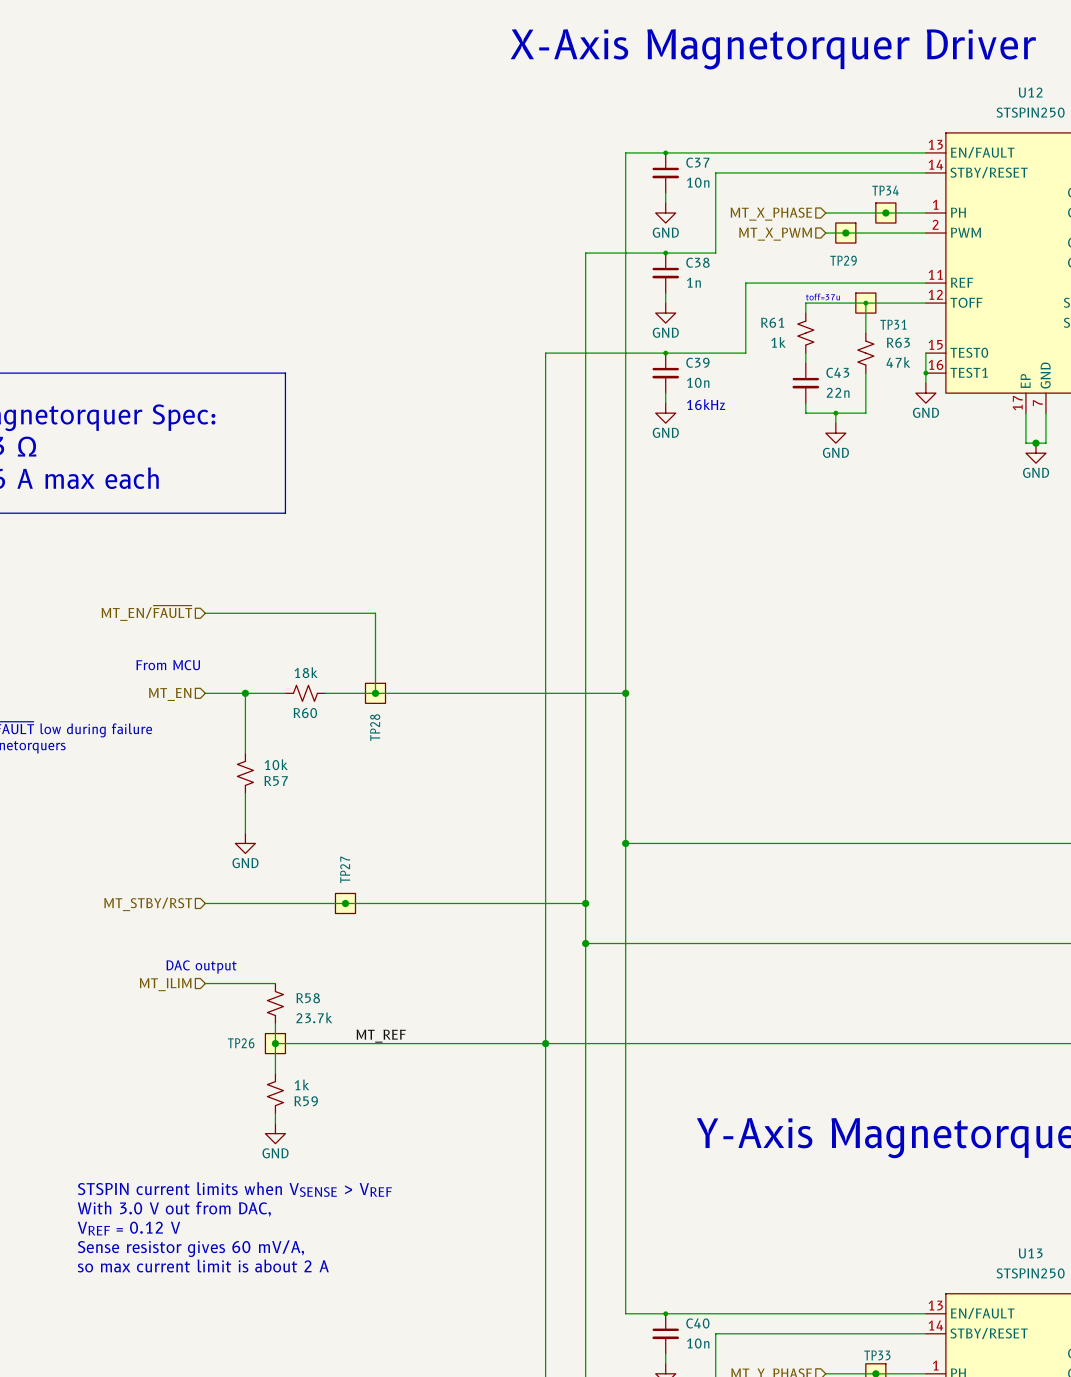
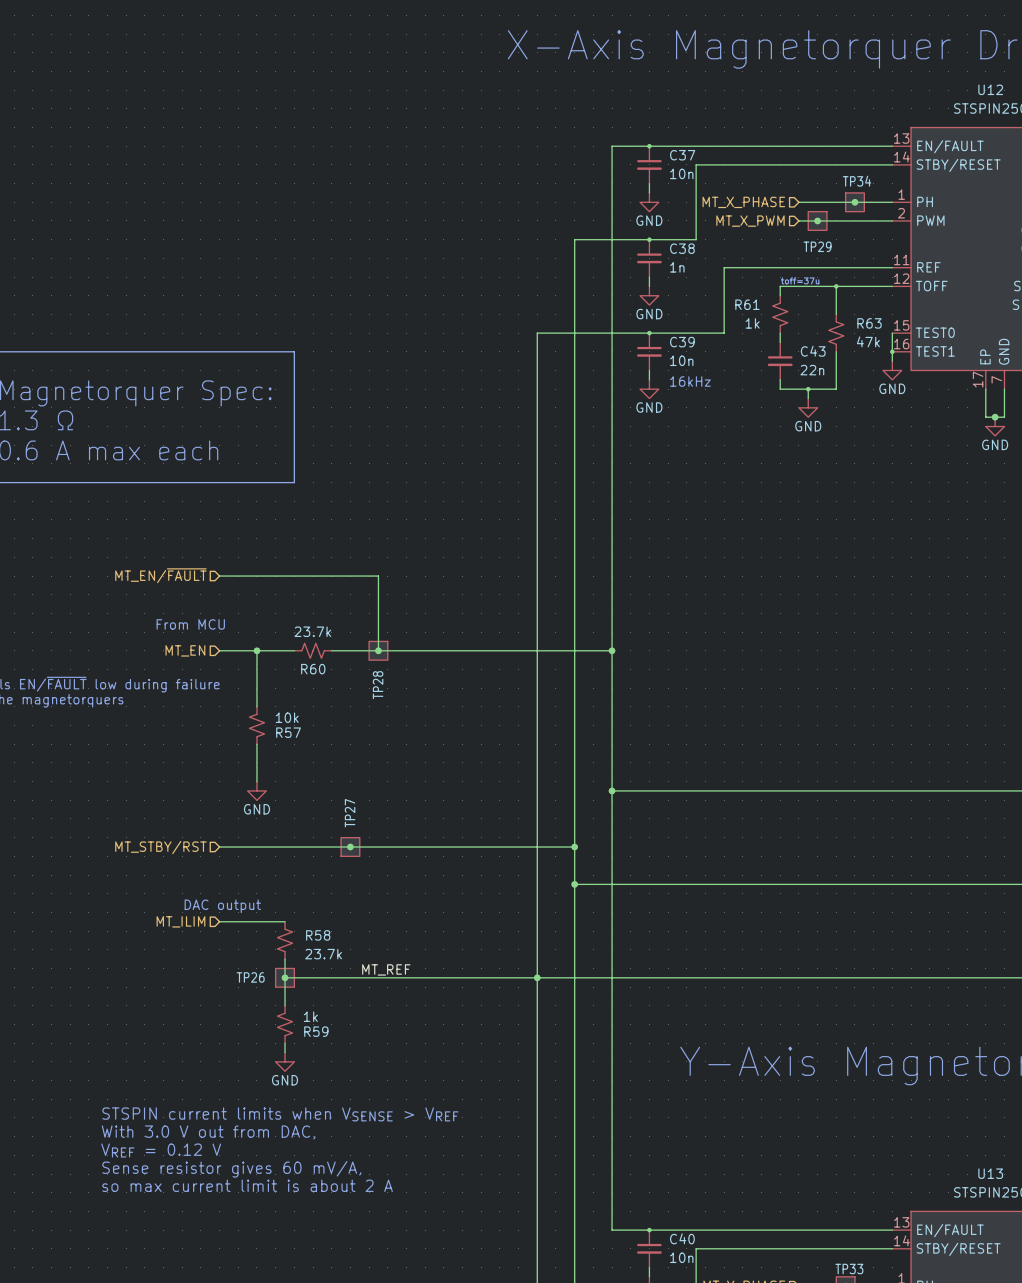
TP31: (865, 303) -> none
R60 value: 18k (306, 672) -> 23.7k (312, 631)

